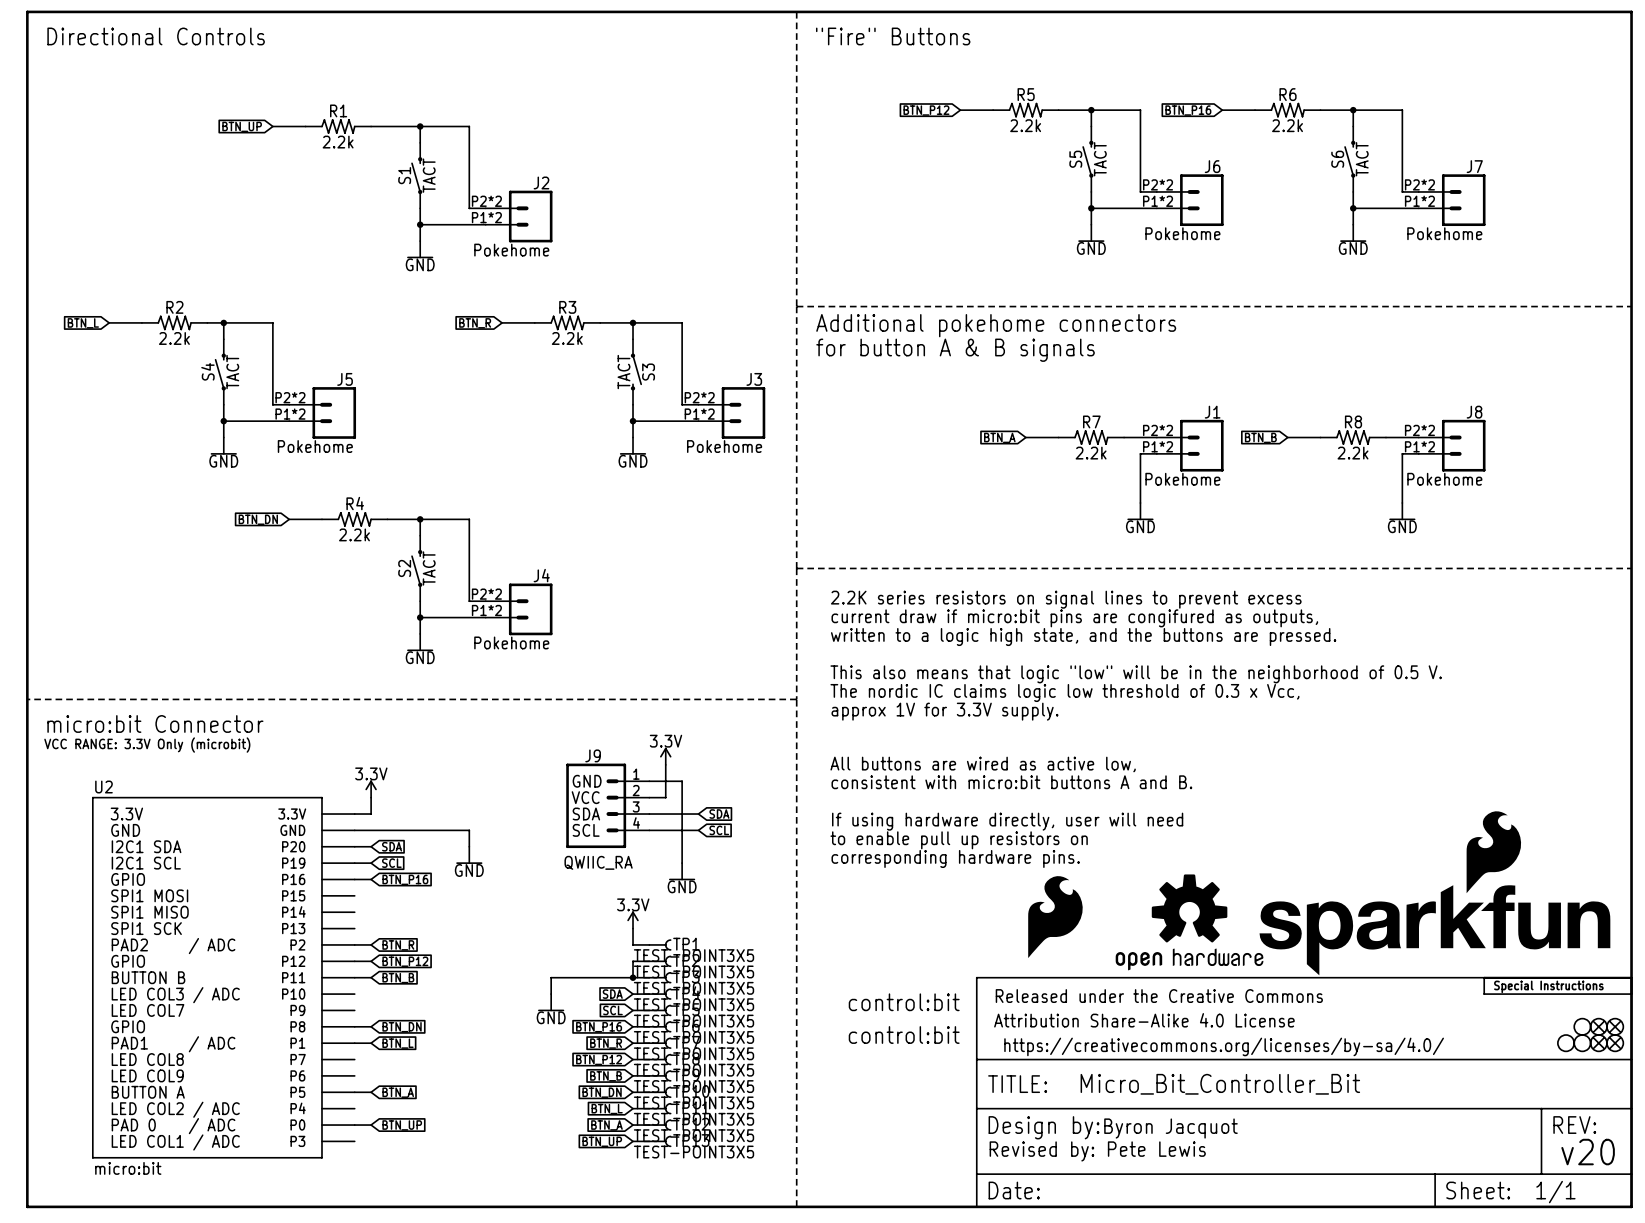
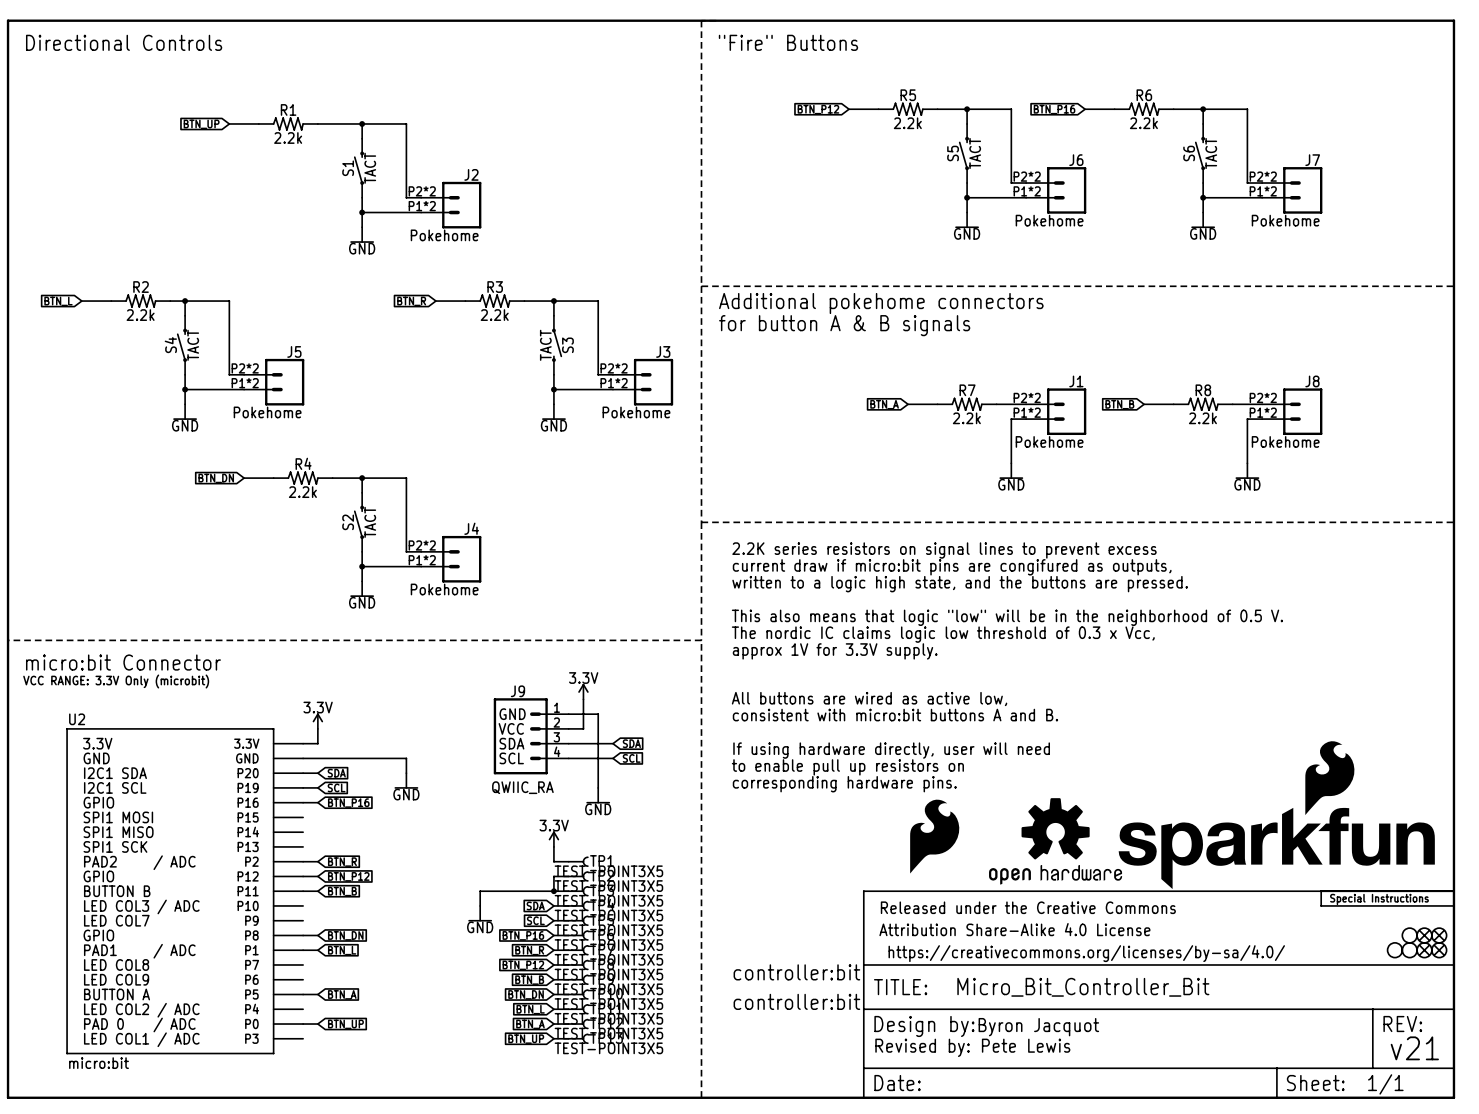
part: (904, 1002) -> none
part: (904, 1035) -> none
part: none -> (796, 972)
part: none -> (796, 1001)
text: v20 (1588, 1152) -> v21 (1414, 1048)

